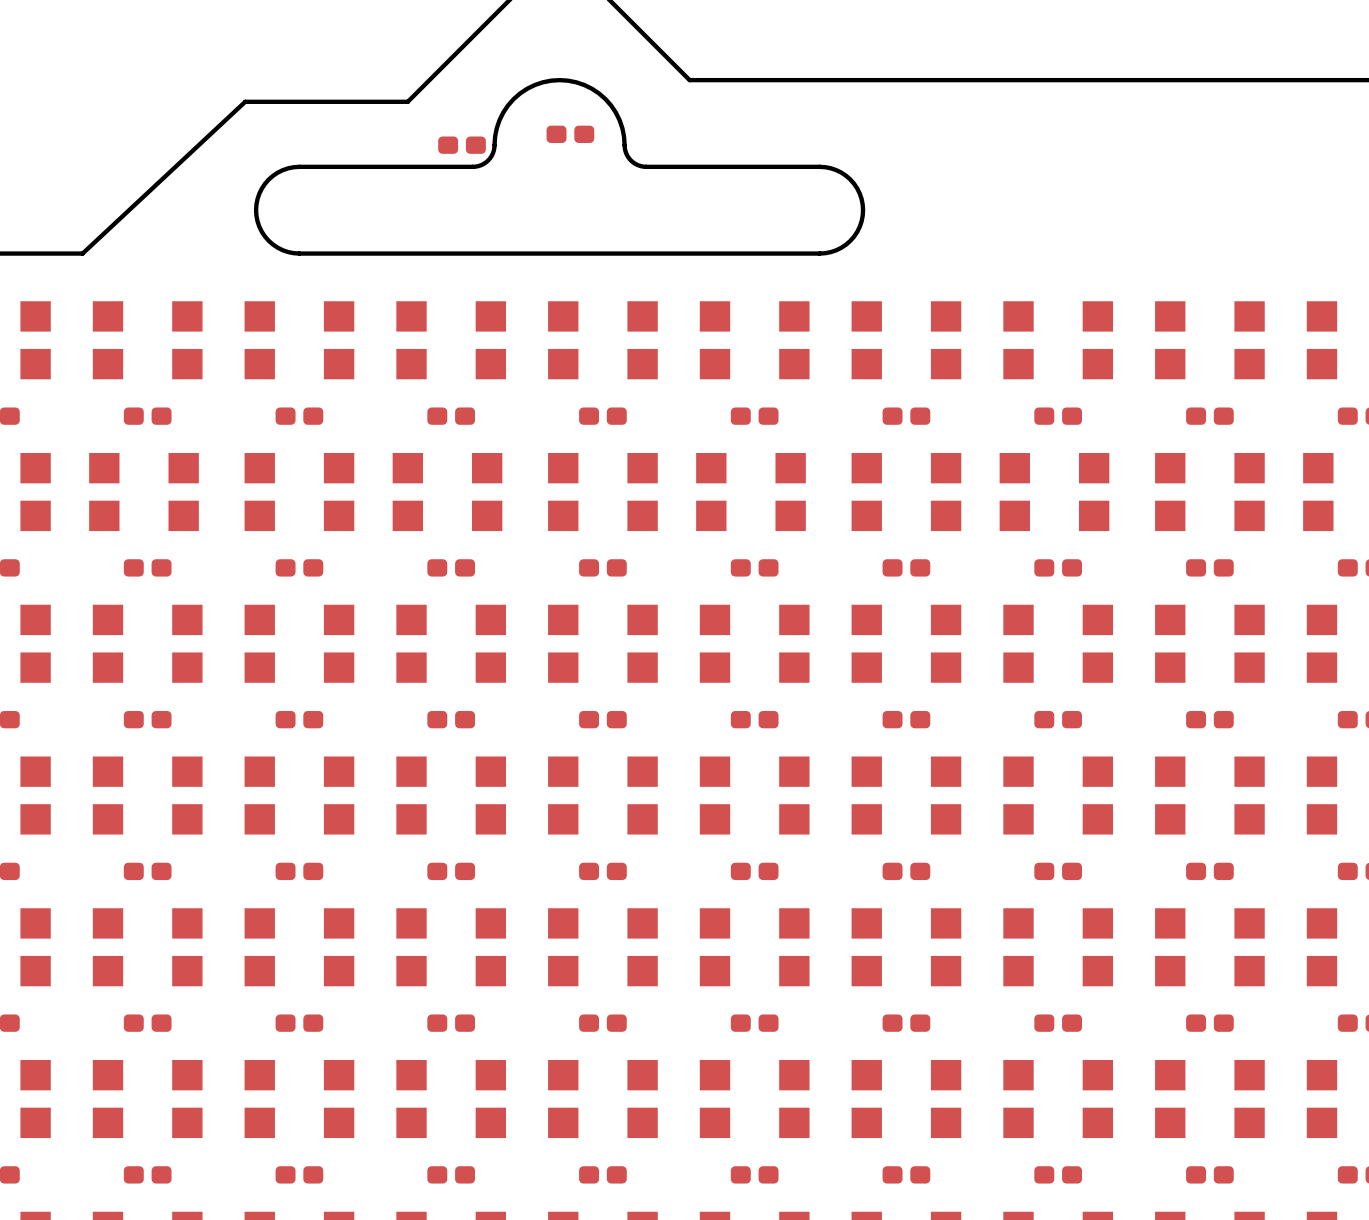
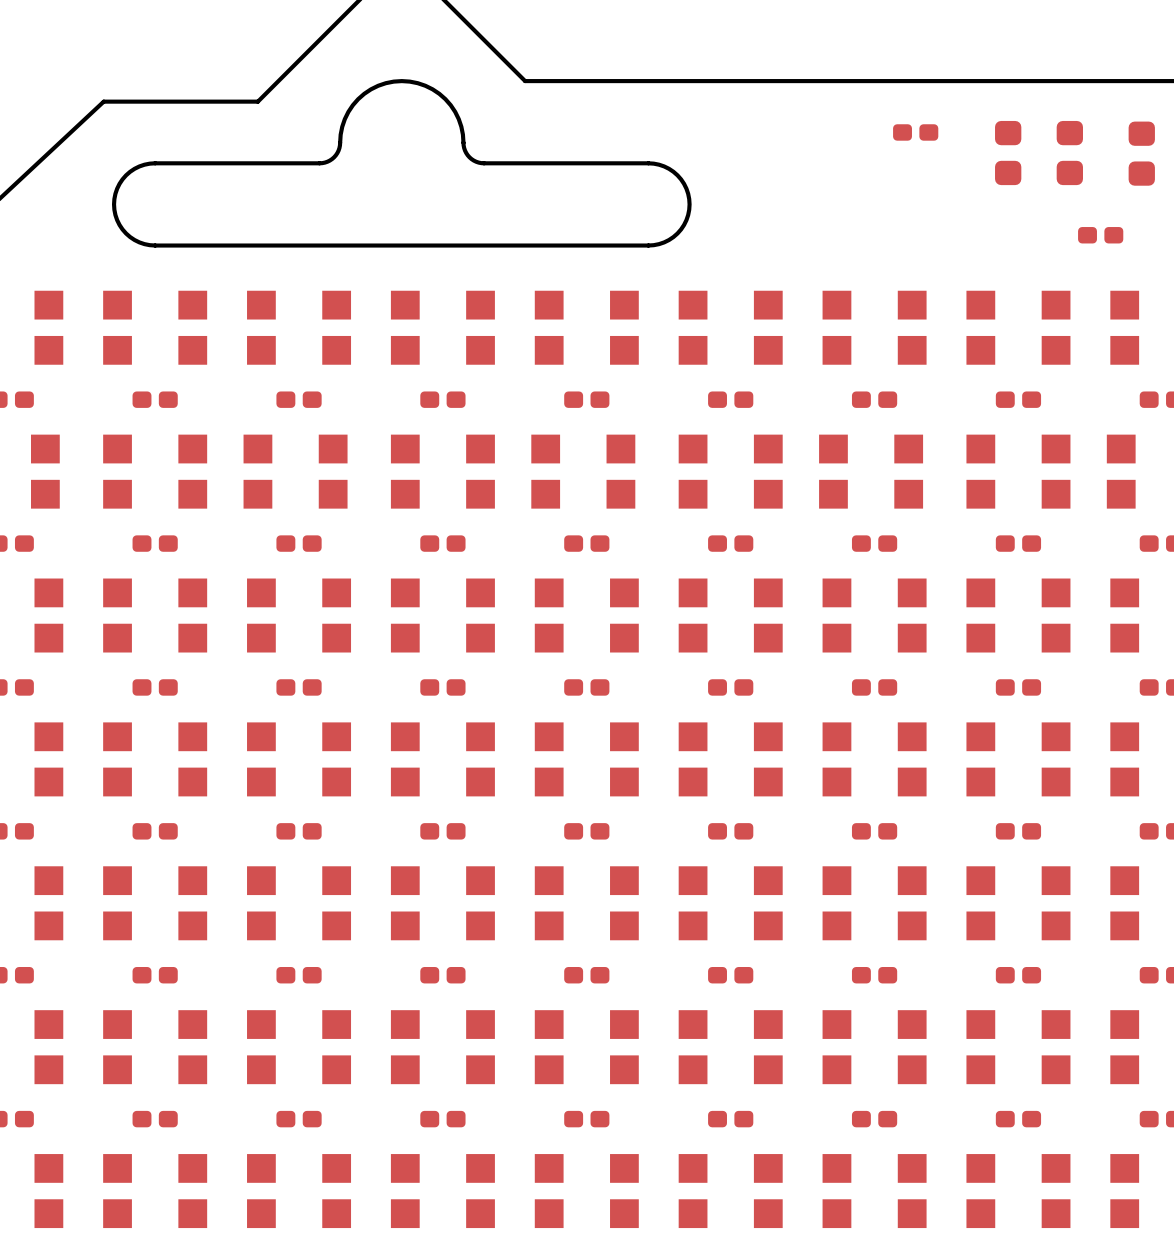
part: (570, 134) -> none
part: none -> (915, 132)
part: (462, 145) -> none
part: none -> (1008, 153)
part: none -> (1069, 153)
part: none -> (1141, 153)
part: none -> (1100, 235)

